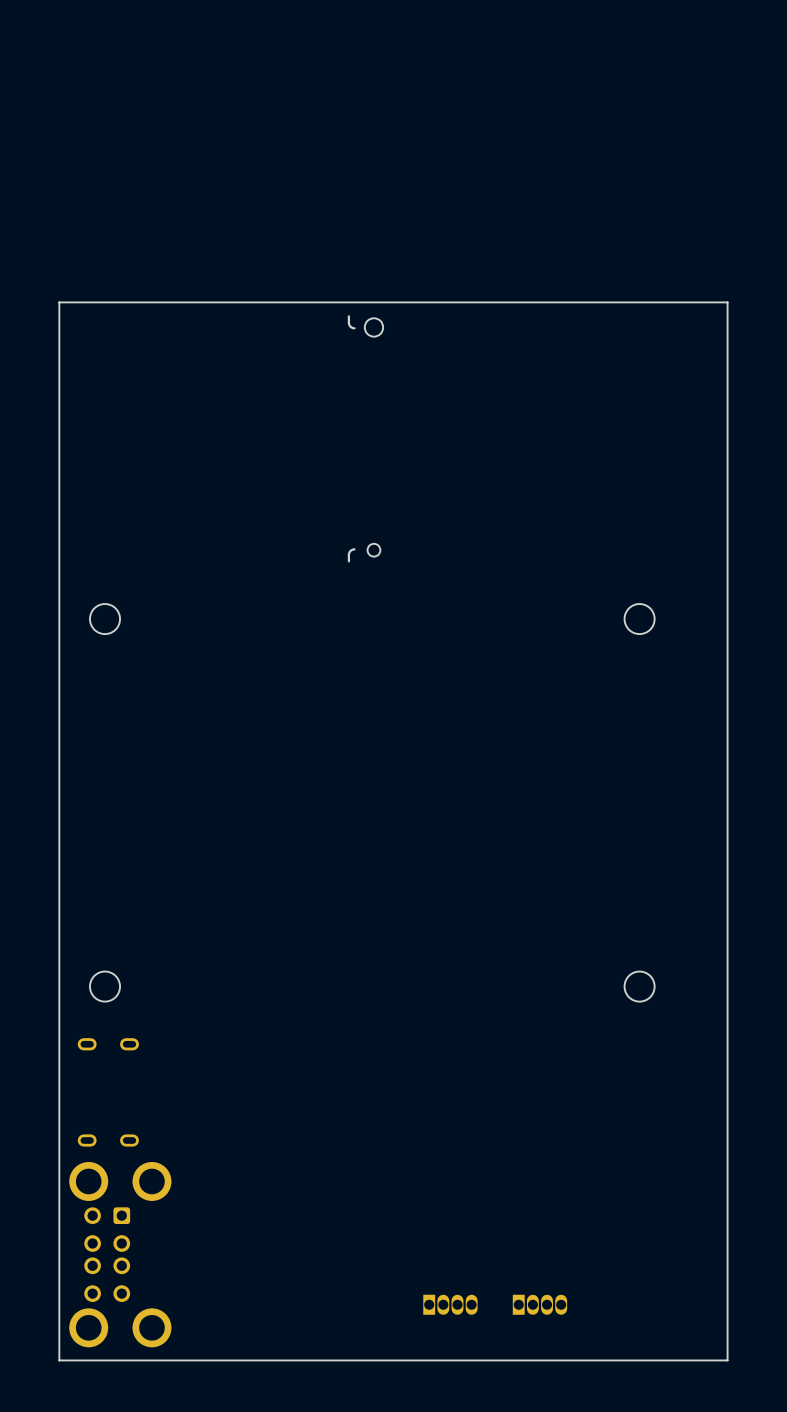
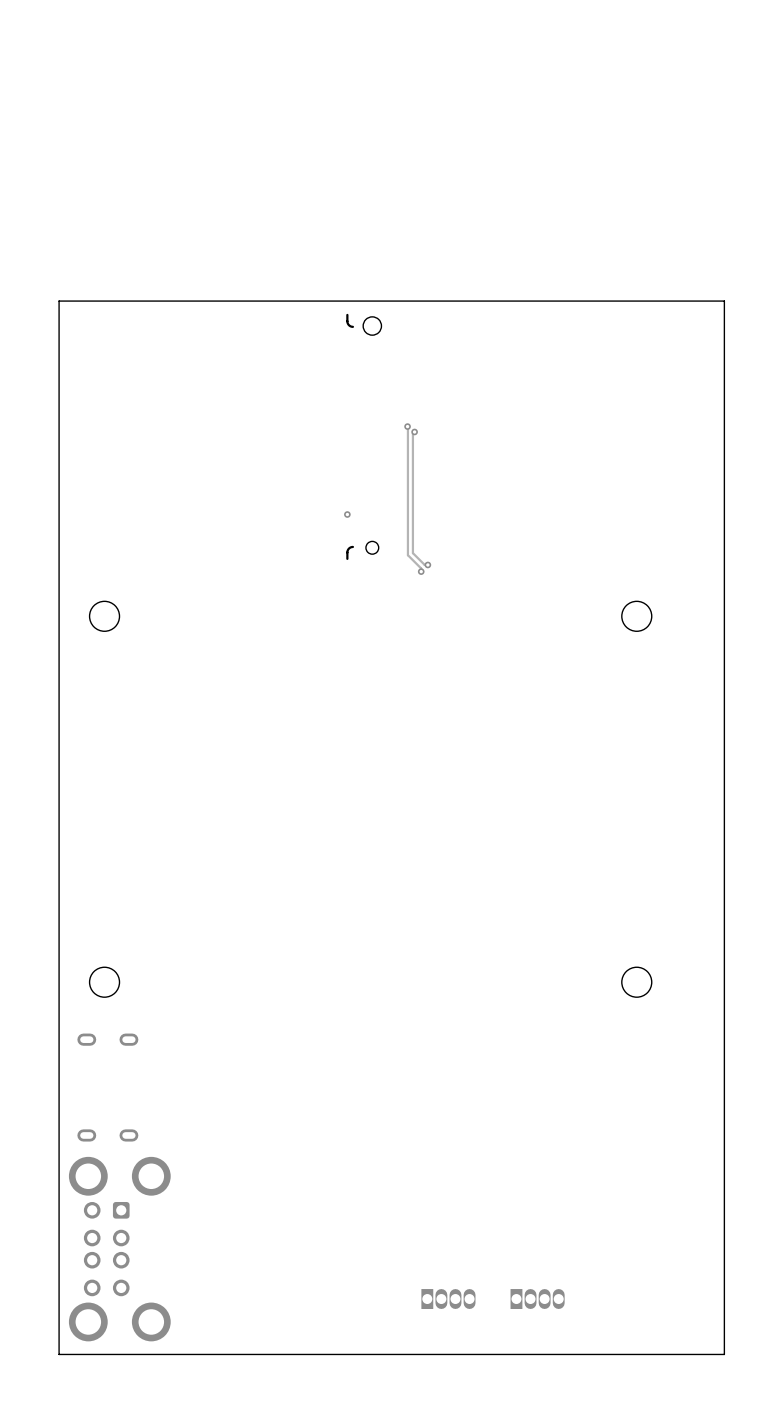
track: none -> (407, 426) (407, 555) (421, 568) (421, 571)
via: none -> (407, 426)
track: none -> (414, 431) (412, 433) (412, 553) (424, 564) (427, 564)
via: none -> (414, 431)
via: none -> (347, 514)
via: none -> (427, 564)
via: none -> (421, 571)

